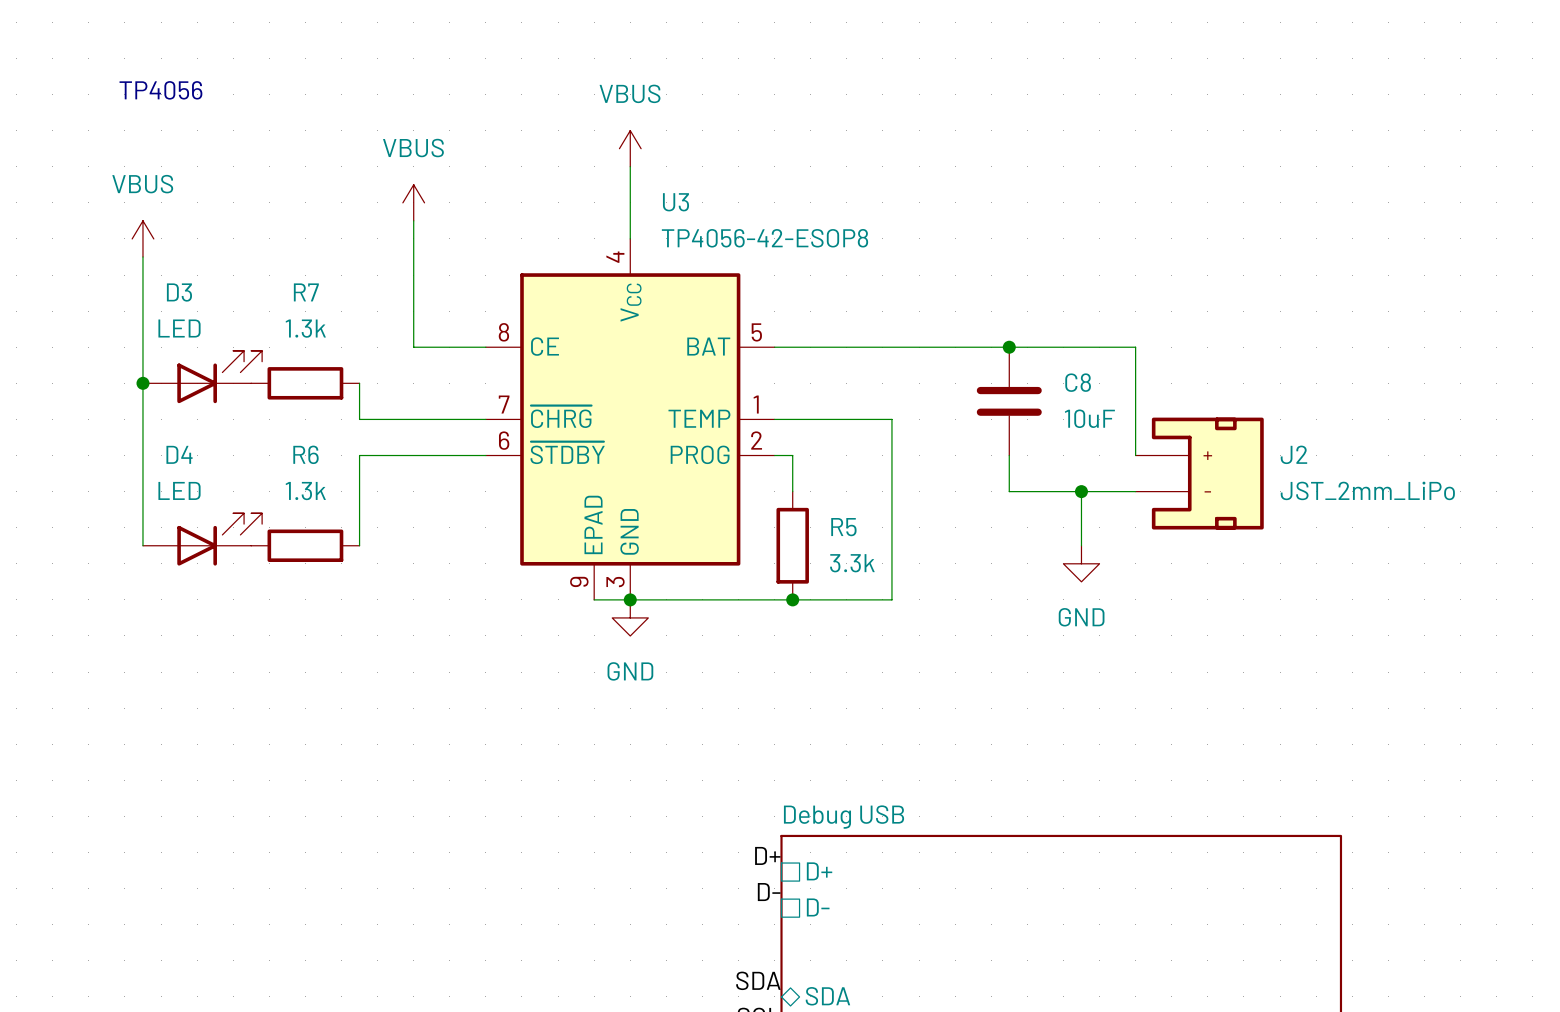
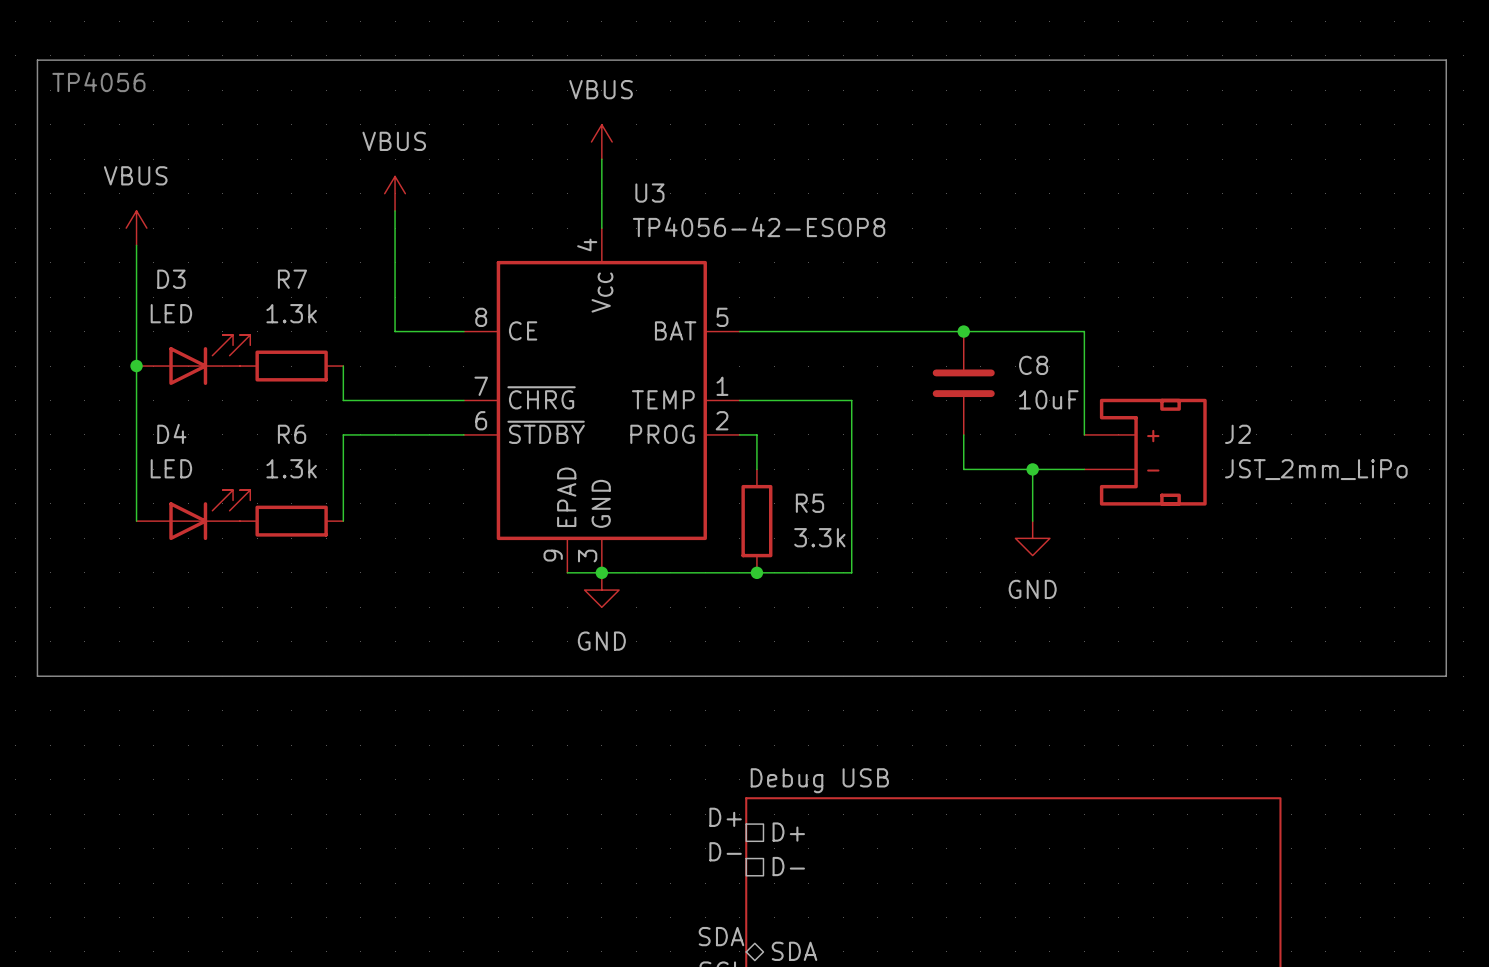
line: none -> (37, 60) (1446, 60) (1446, 676) (37, 676) (37, 60)
text position: TP4056 (160, 90) -> TP4056 (98, 82)

